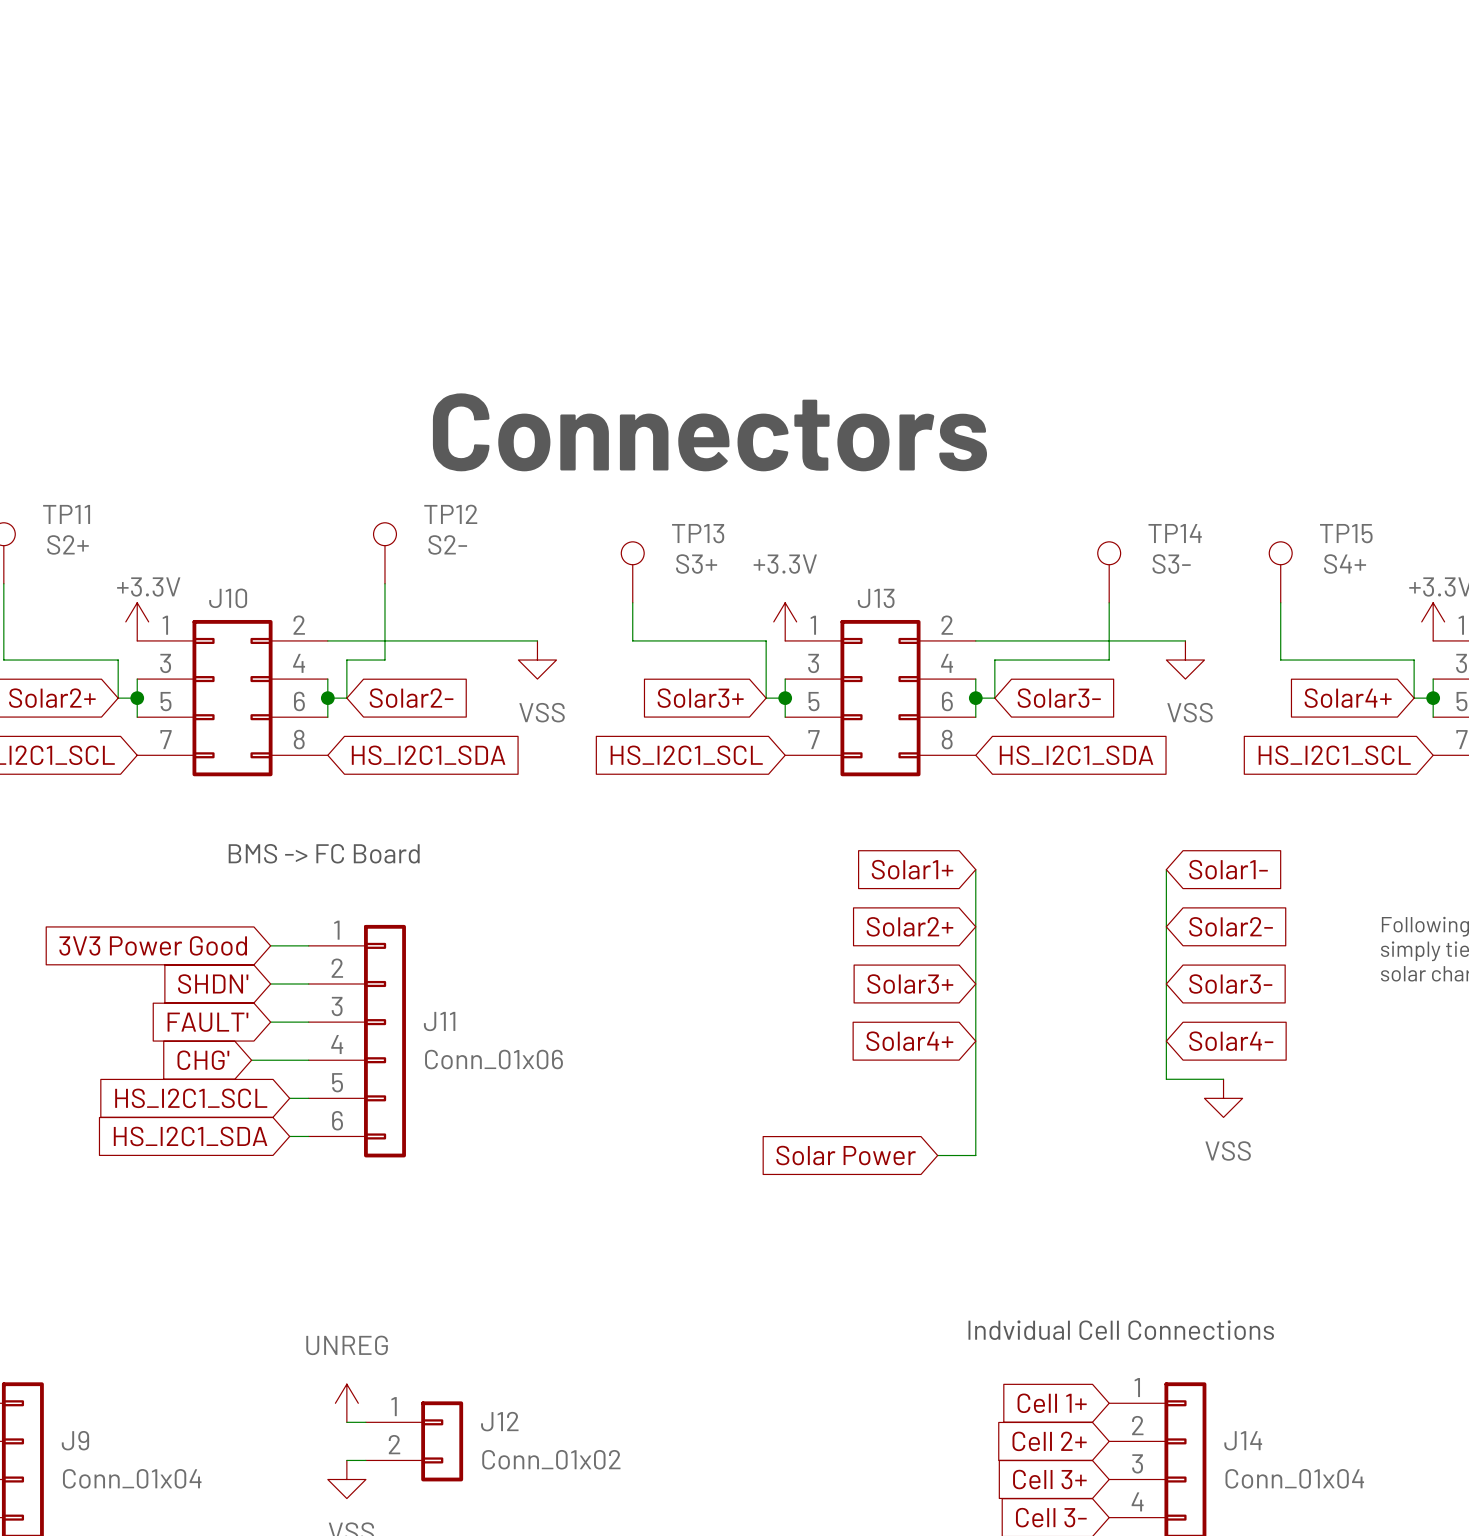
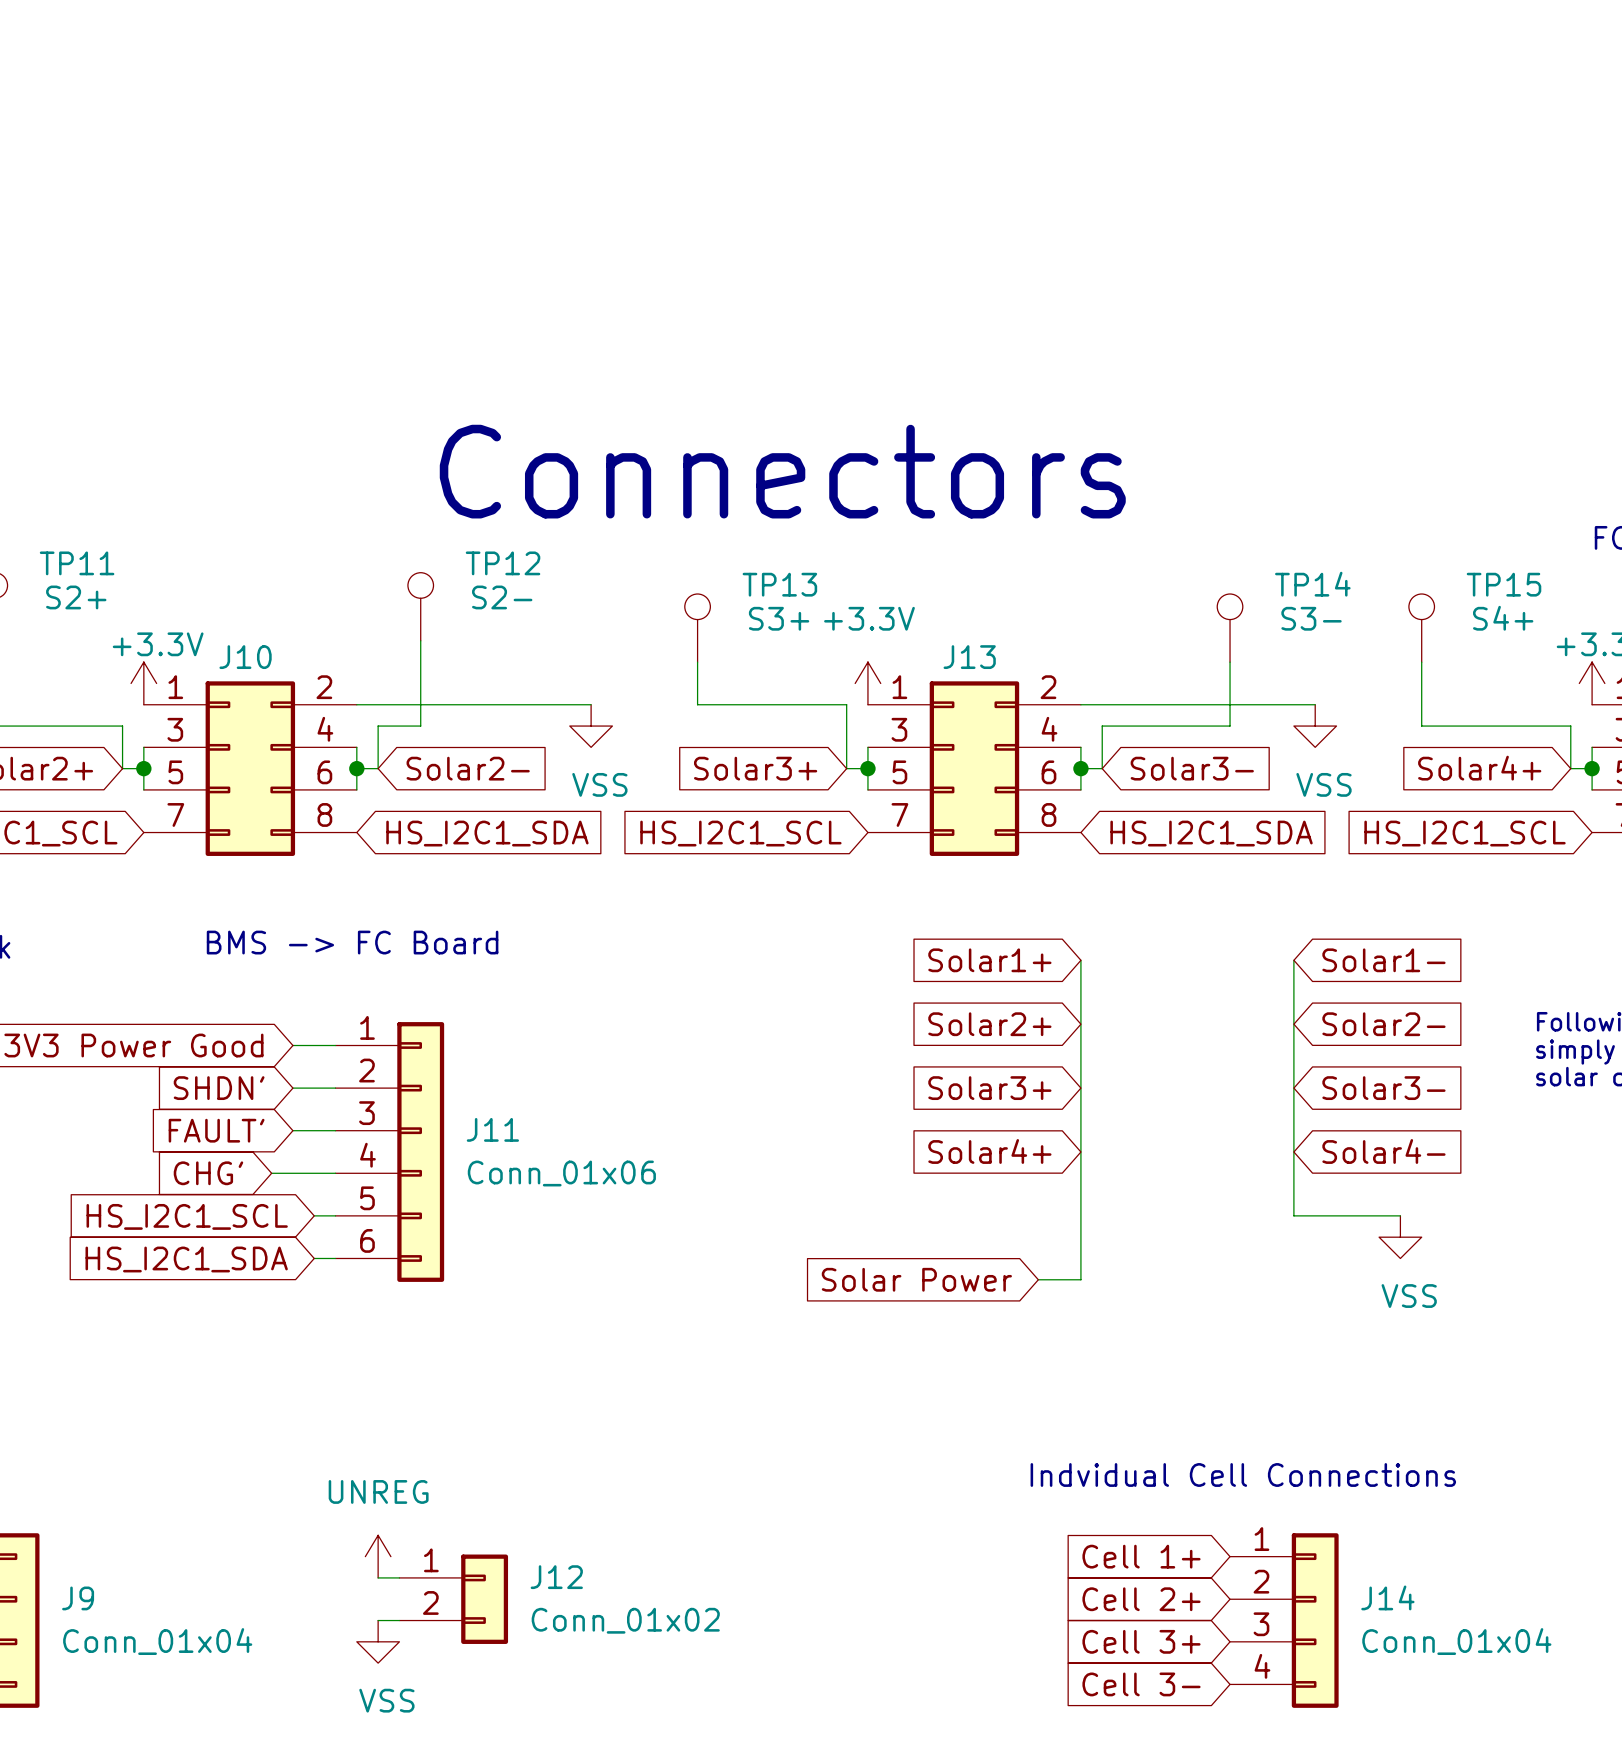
wire: (1166, 1079) (1223, 1079) -> (1293, 1194) (1293, 1215) (1400, 1215)
power symbol position: VSS (1223, 1098) -> VSS (1400, 1237)

